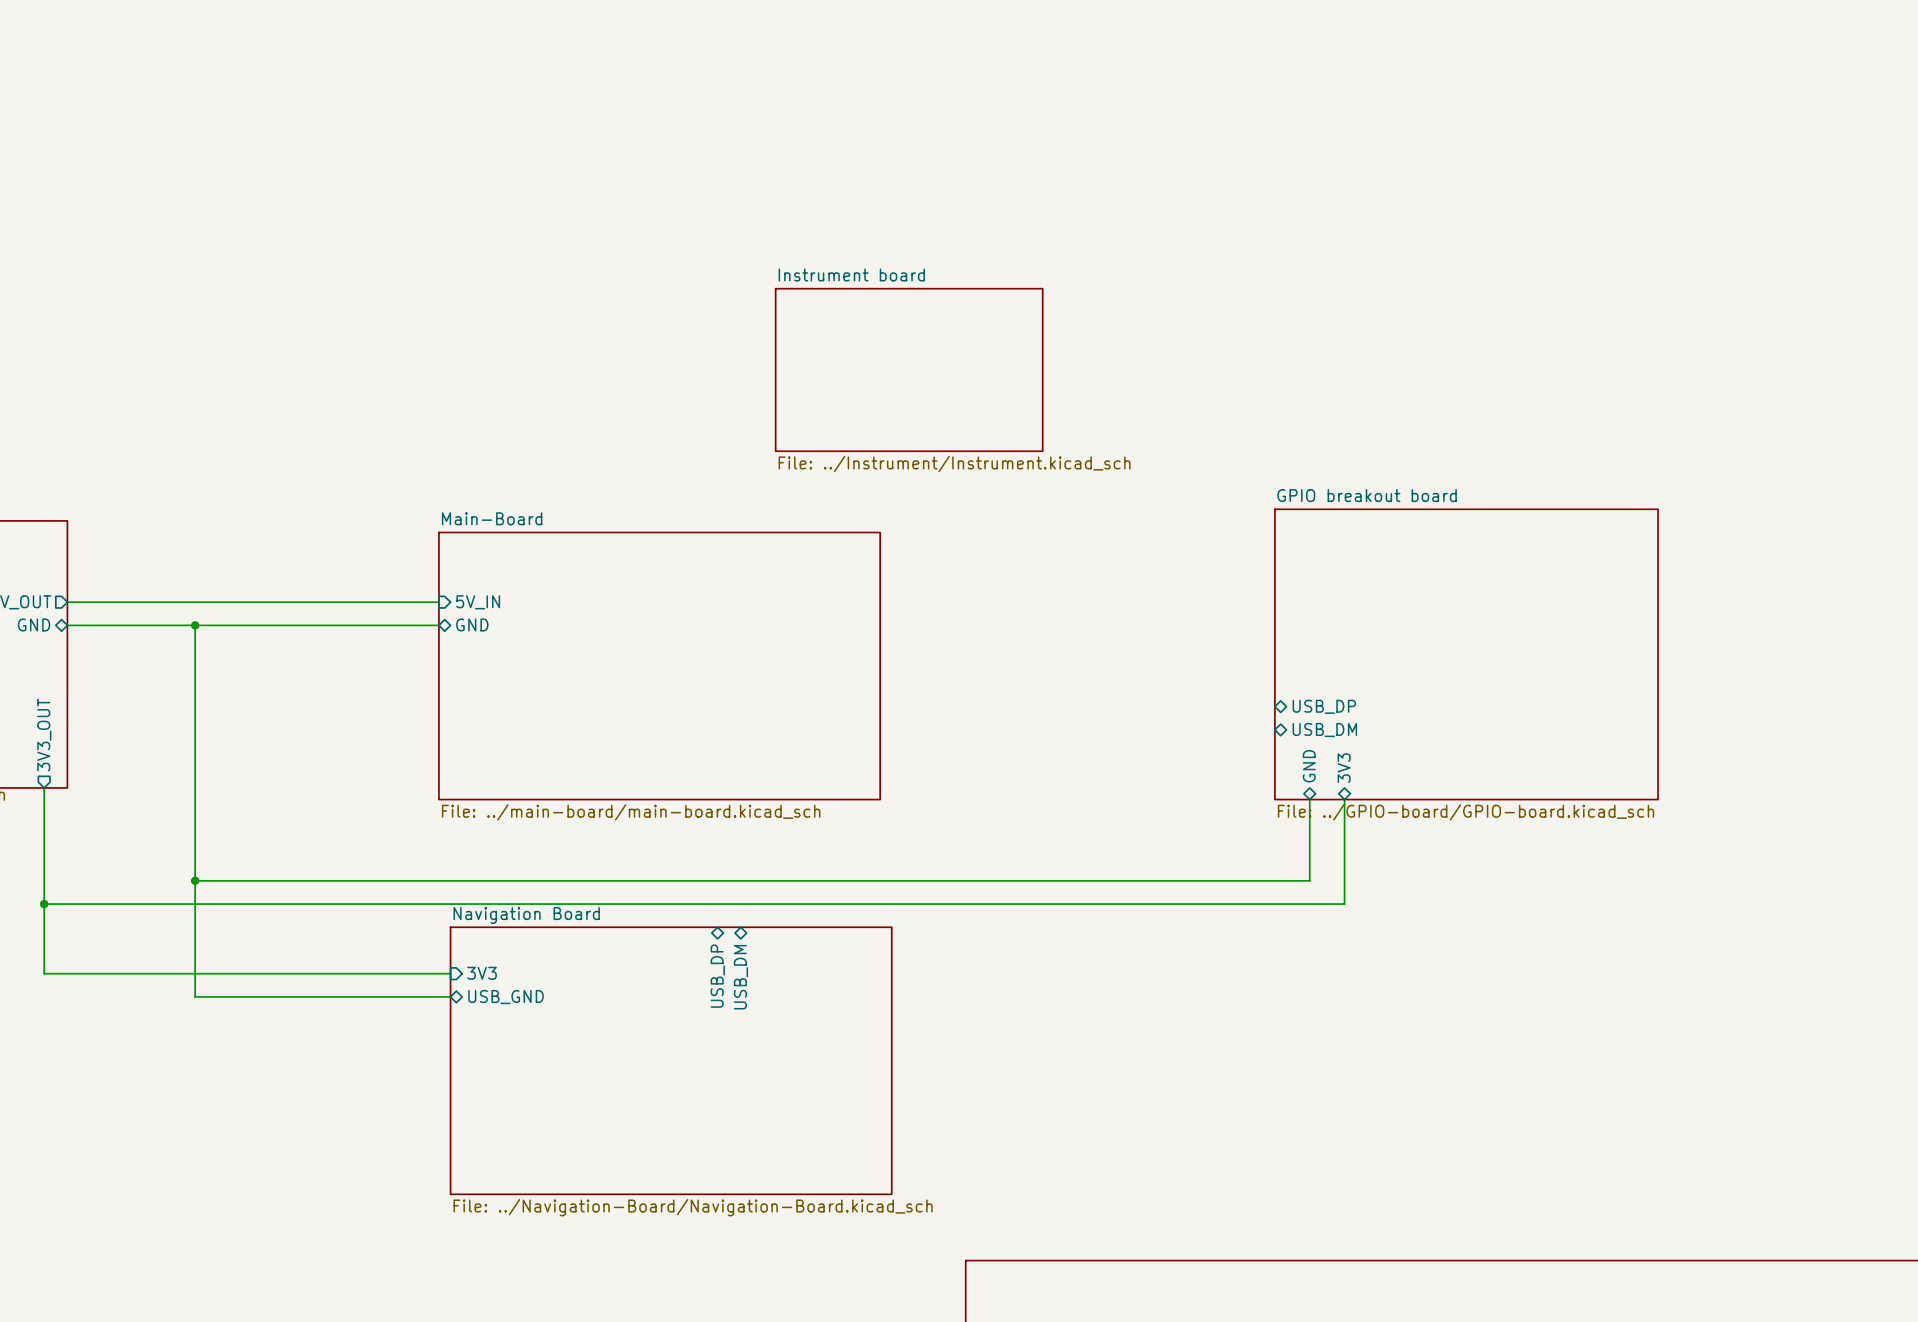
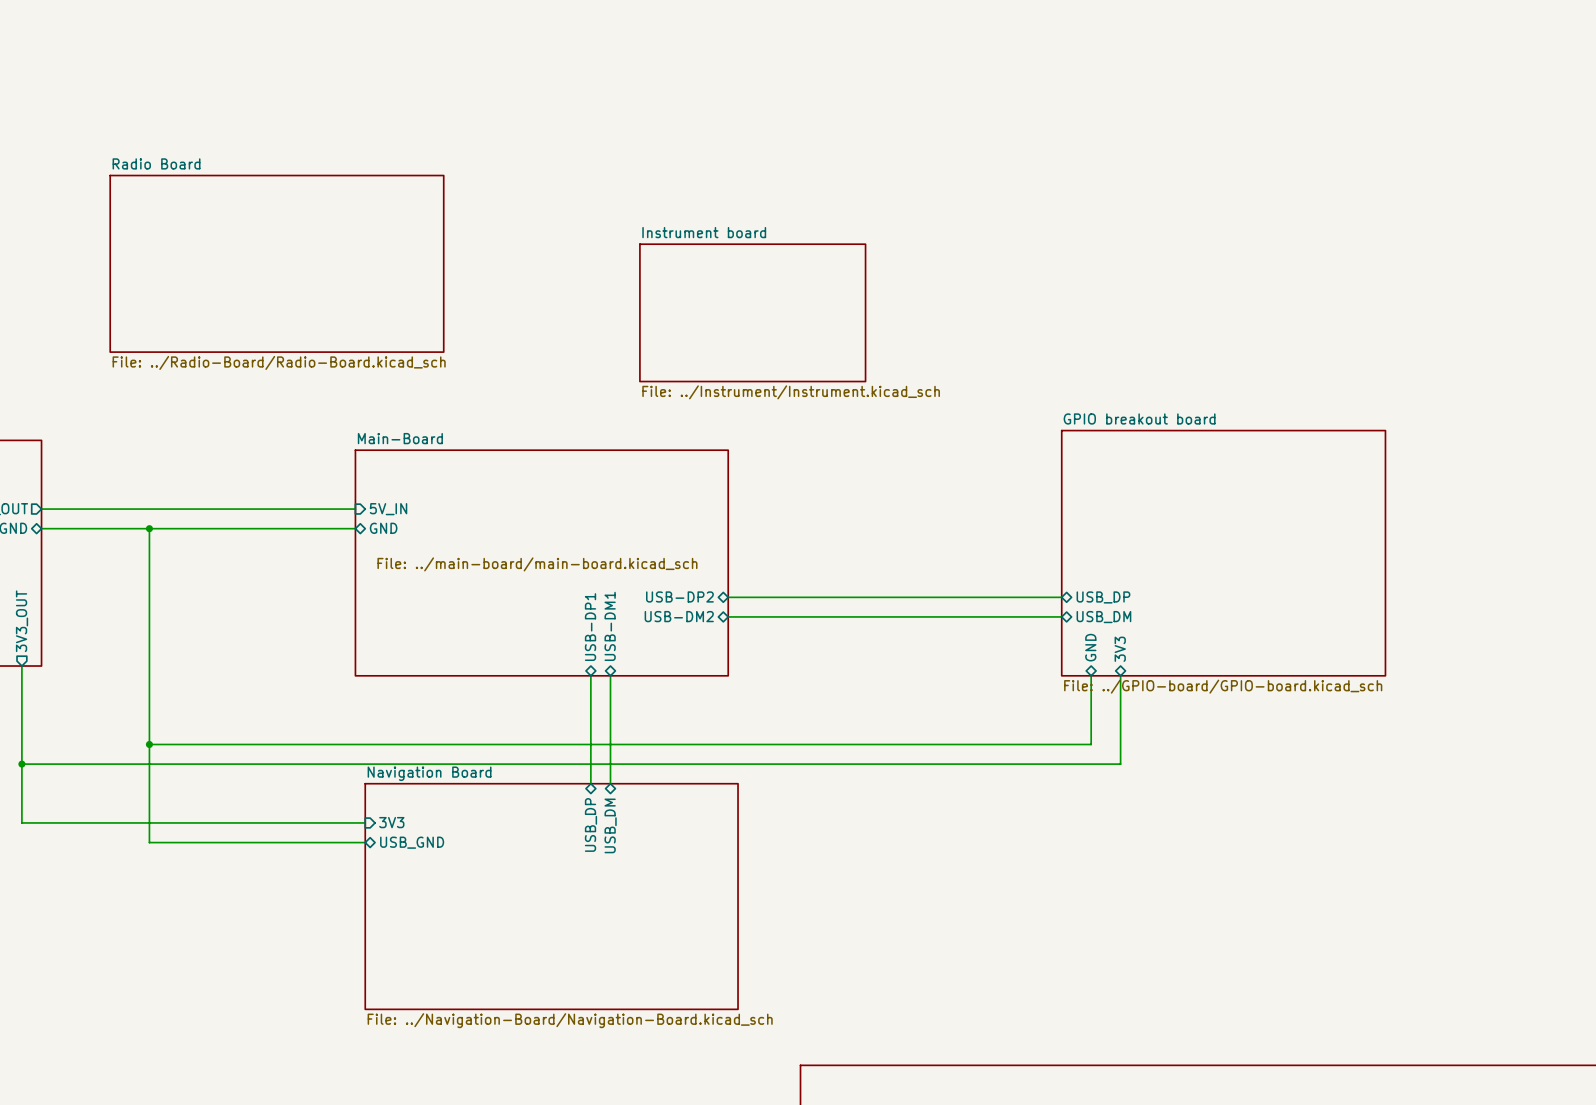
sheet Radio Board: none -> File: ../Radio-Board/Radio-Board.kicad_sch (276, 263)
sheet pin: none -> USB-DP2 (679, 596)
wire: none -> (728, 597) (1061, 597)
sheet pin: none -> USB-DM2 (679, 616)
wire: none -> (728, 616) (1061, 616)
sheet pin: none -> USB-DP1 (590, 627)
sheet pin: none -> USB-DM1 (610, 626)
wire: none -> (590, 675) (590, 783)
wire: none -> (610, 675) (610, 783)
sheet Main-Board value position: File: ../main-board/main-board.kicad_sch (631, 812) -> File: ../main-board/main-board.kicad_sch (537, 564)

